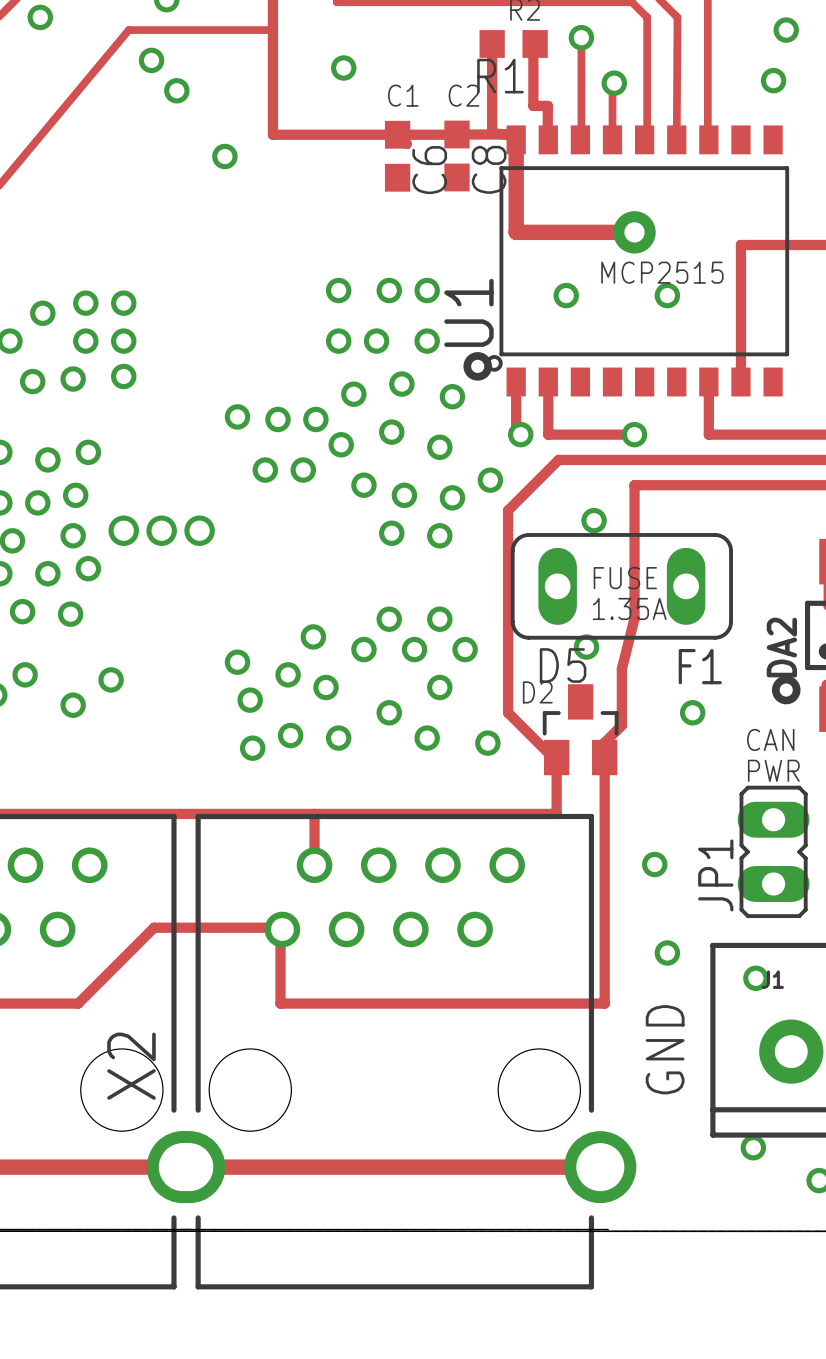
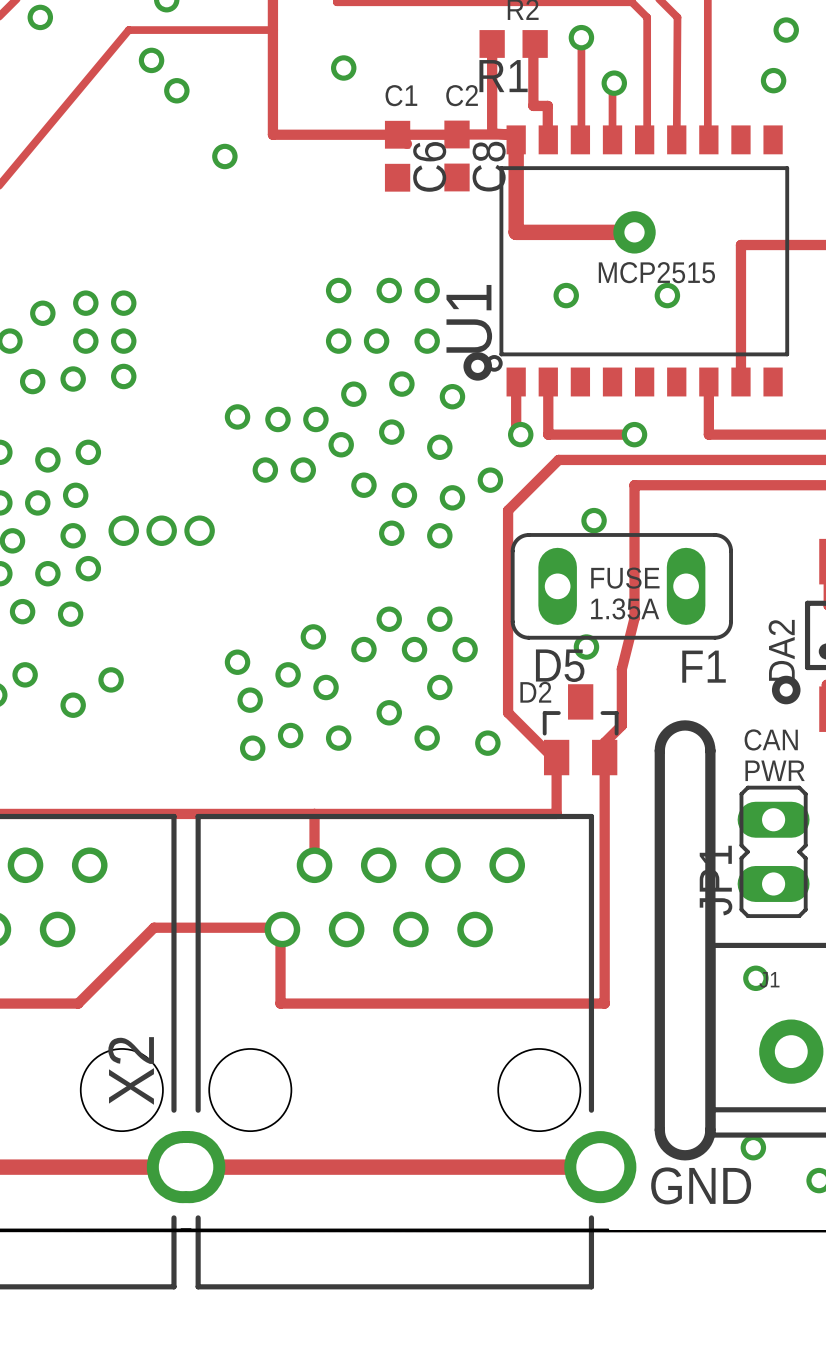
via: (692, 712) -> none
line: none -> (659, 750) (660, 1133) (663, 1142) (669, 1150) (678, 1154) (688, 1155) (697, 1151) (705, 1145) (710, 1130) (710, 747) (706, 738) (700, 730) (685, 725) (675, 727) (667, 732) (661, 741) (659, 750)
via: (654, 864) -> none
via: (667, 953) -> none
text rotation: 0° (665, 1049) -> 90° clockwise (701, 1185)
text position: GND (665, 1049) -> GND (701, 1185)

